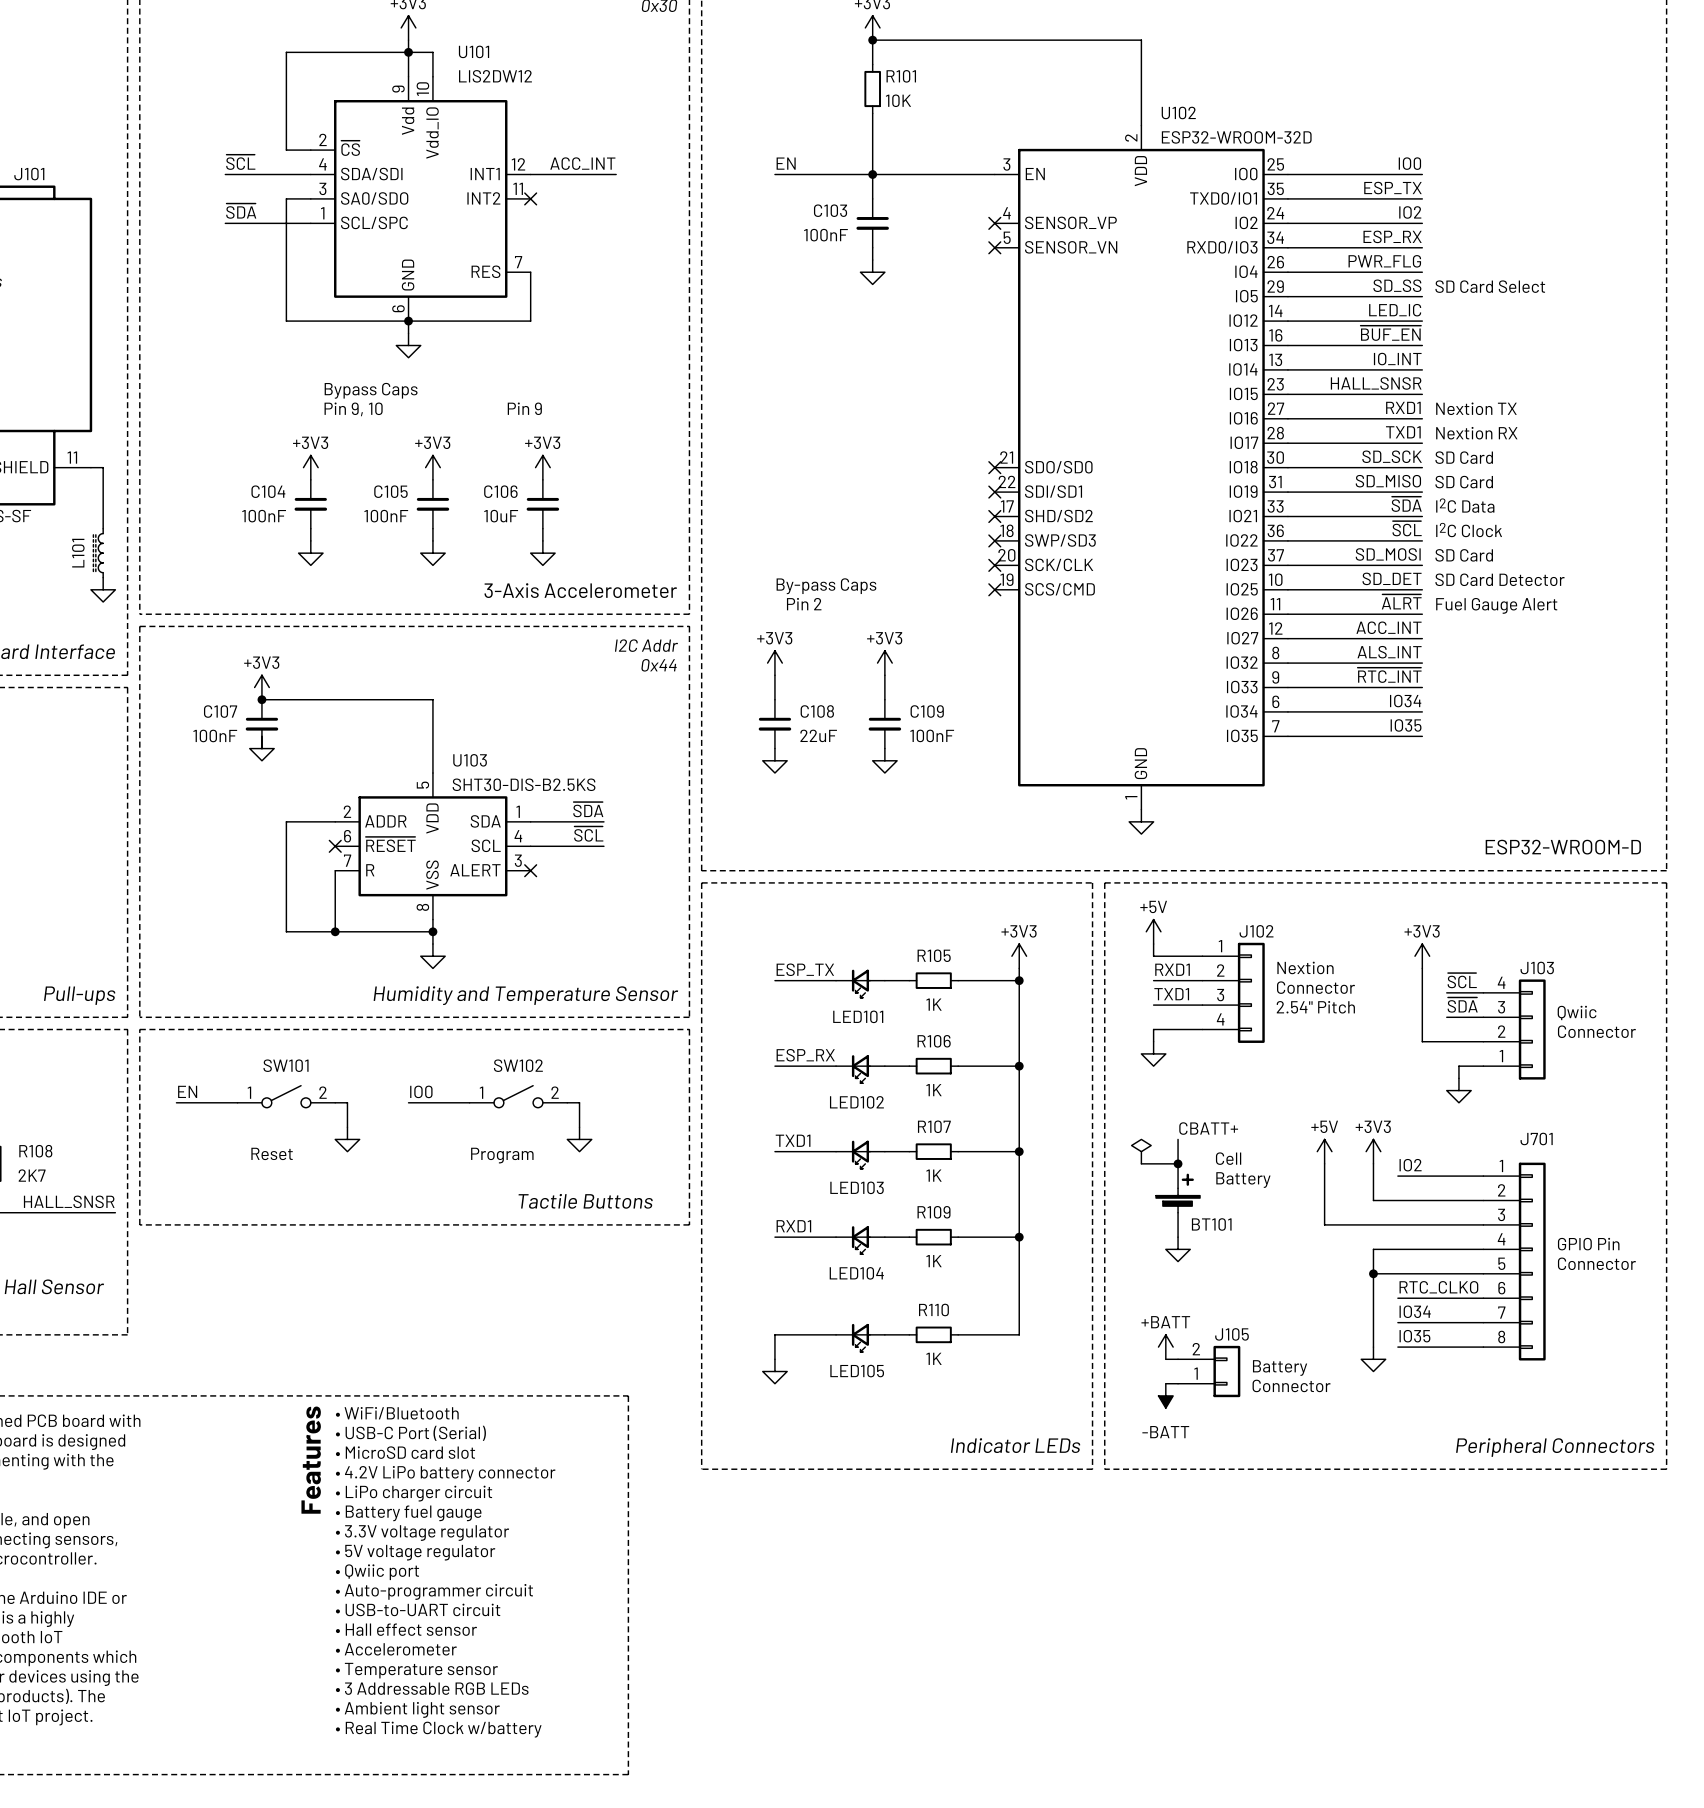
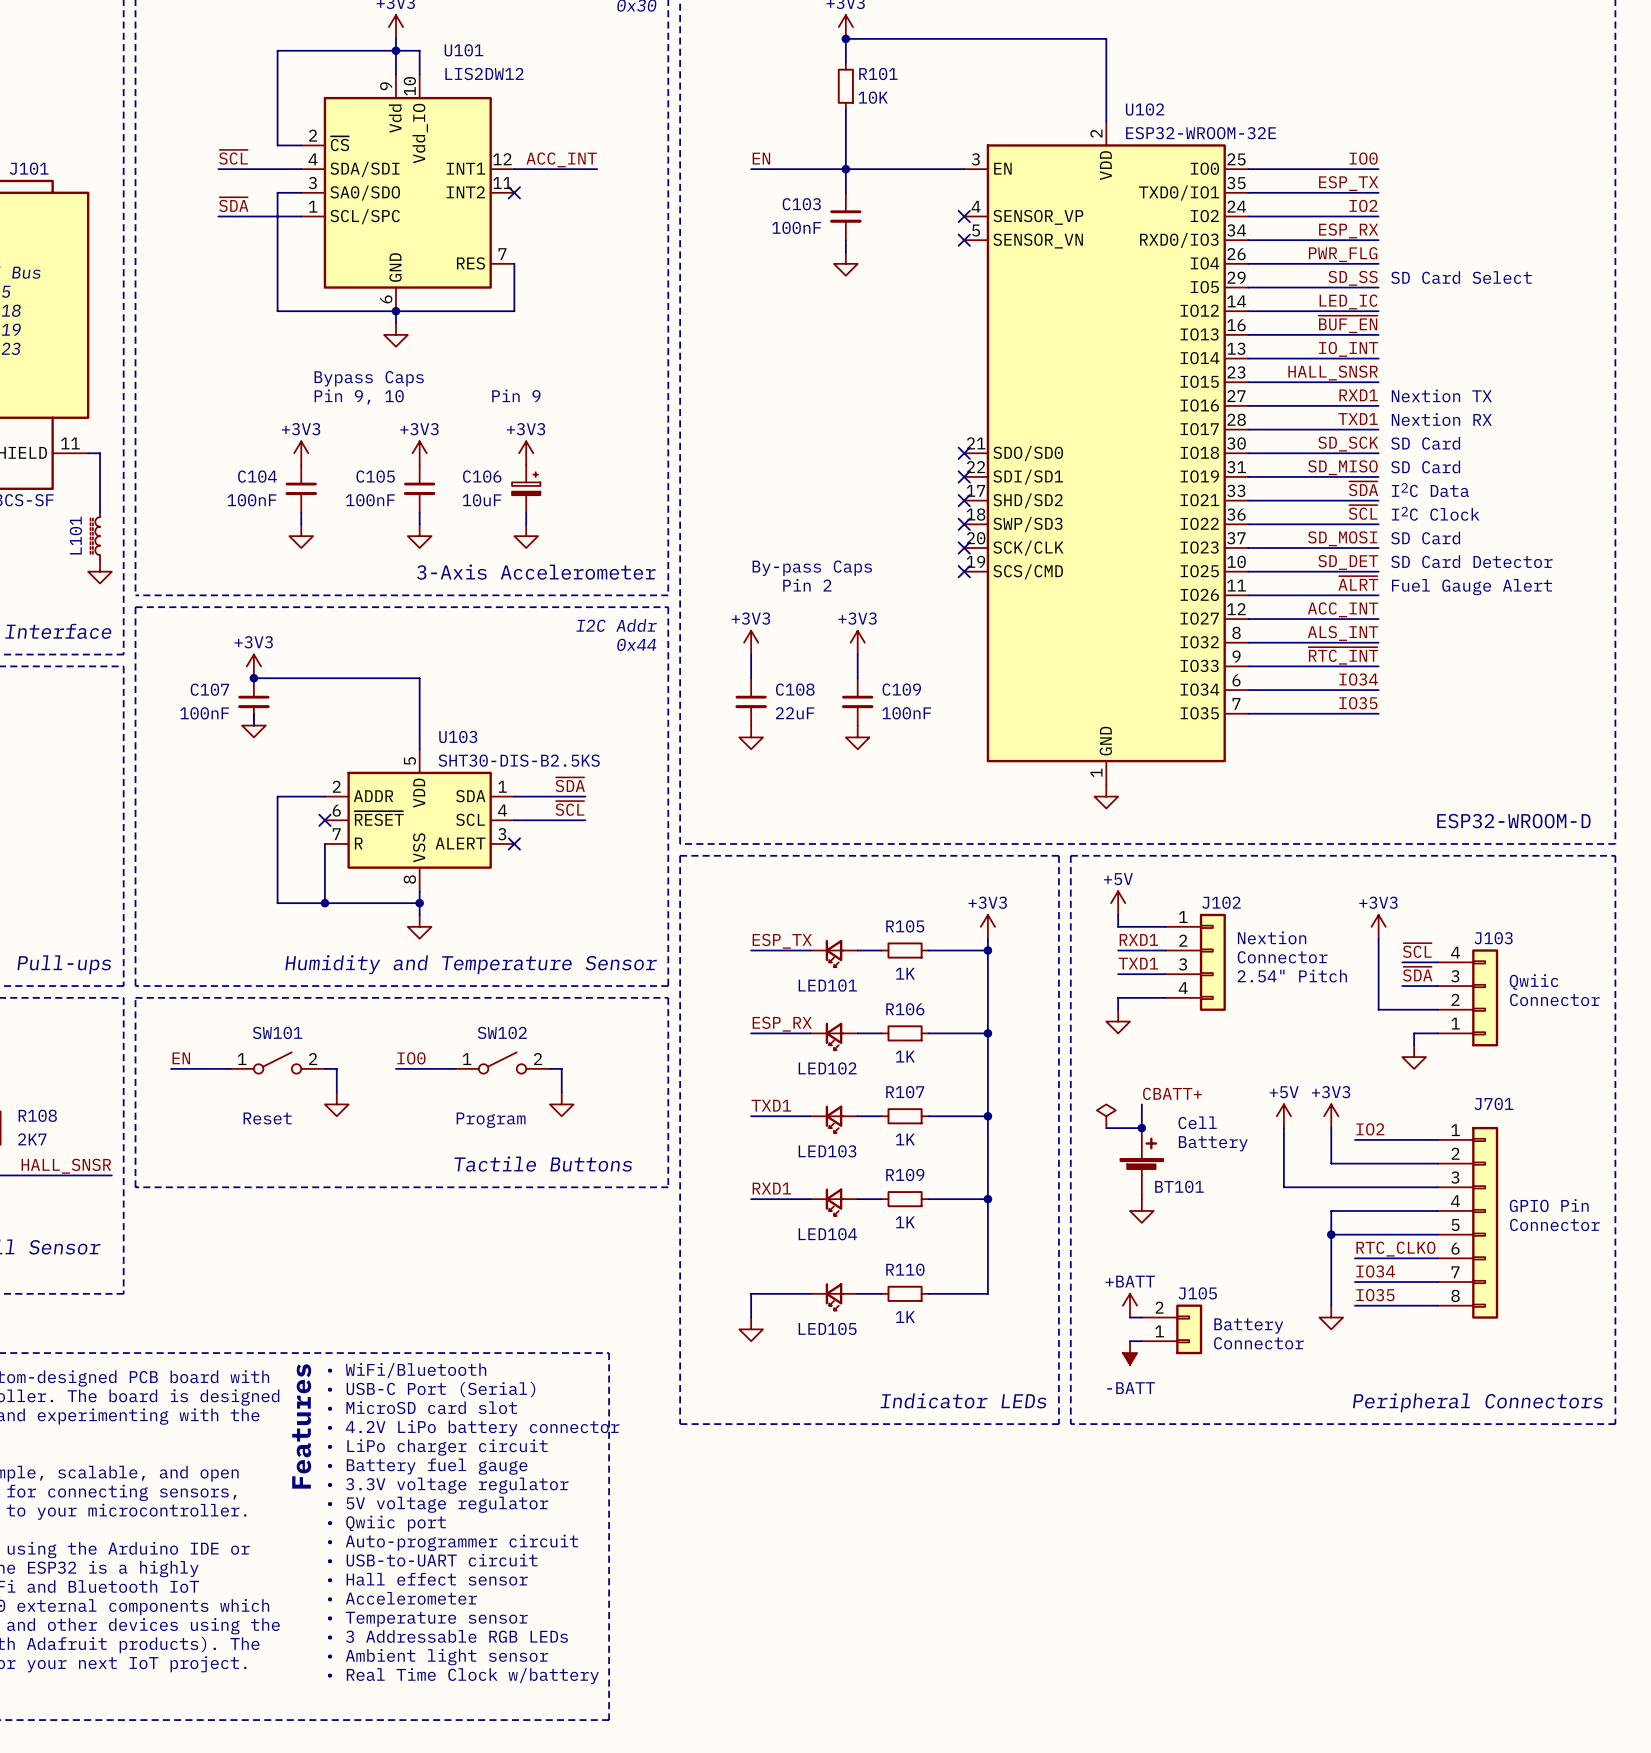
U102 value: ESP32-WROOM-32D (1236, 137) -> ESP32-WROOM-32E (1200, 133)
C106 symbol: [526, 479, 560, 529] -> [512, 465, 541, 513]

